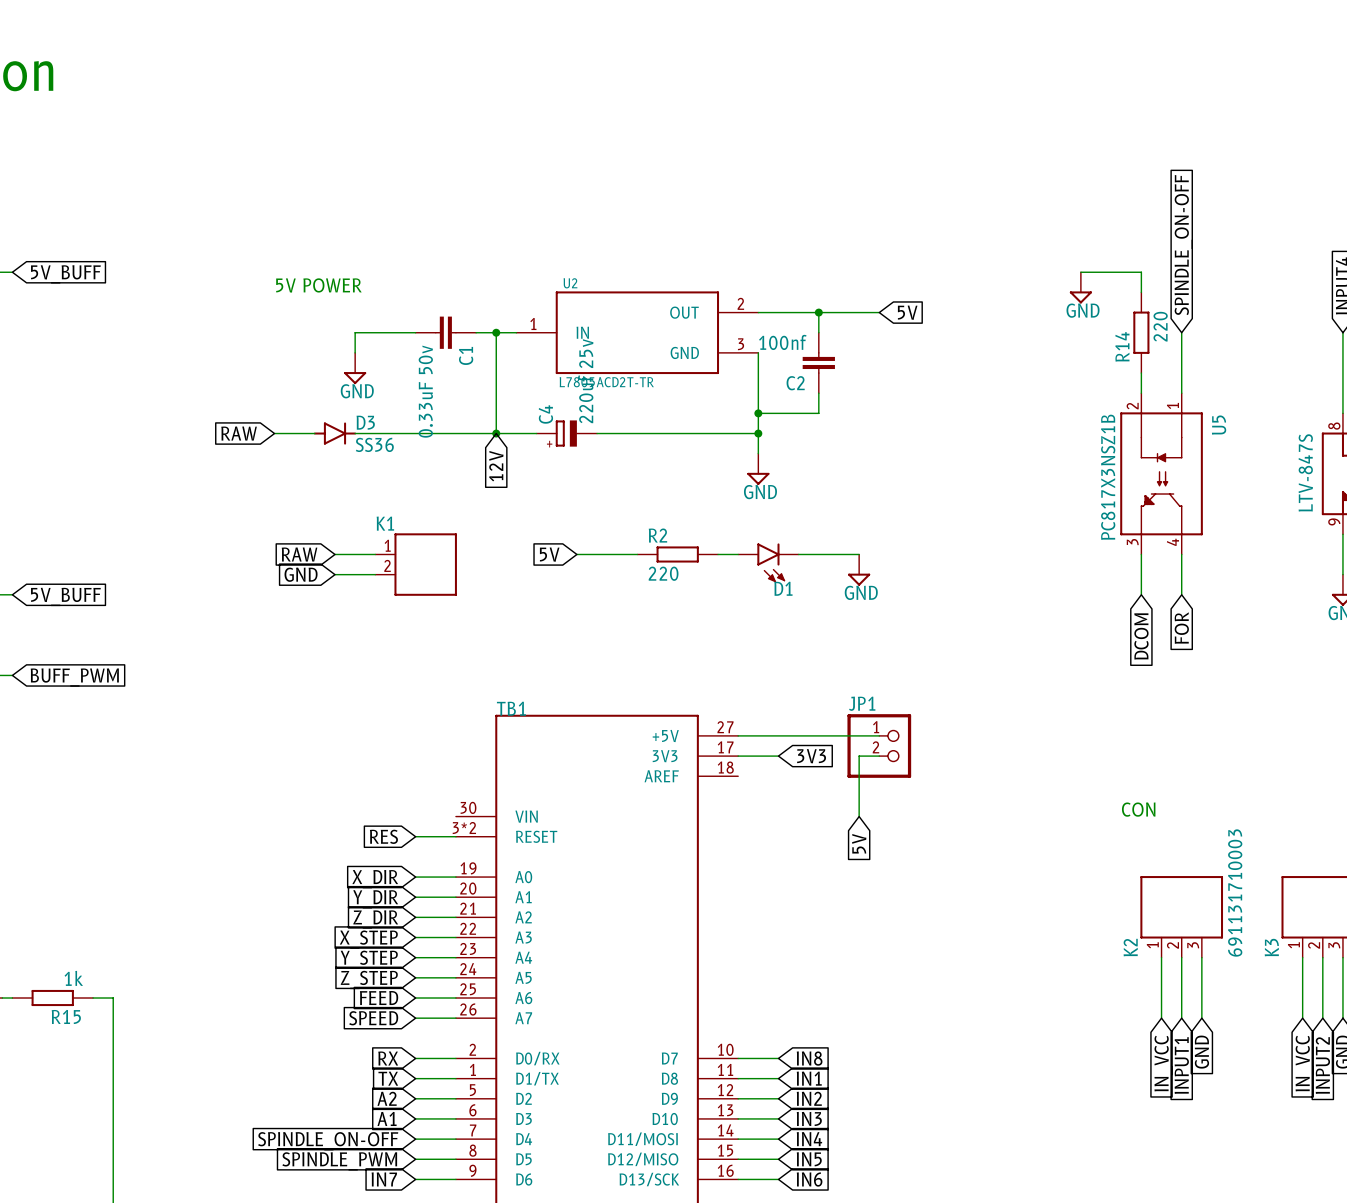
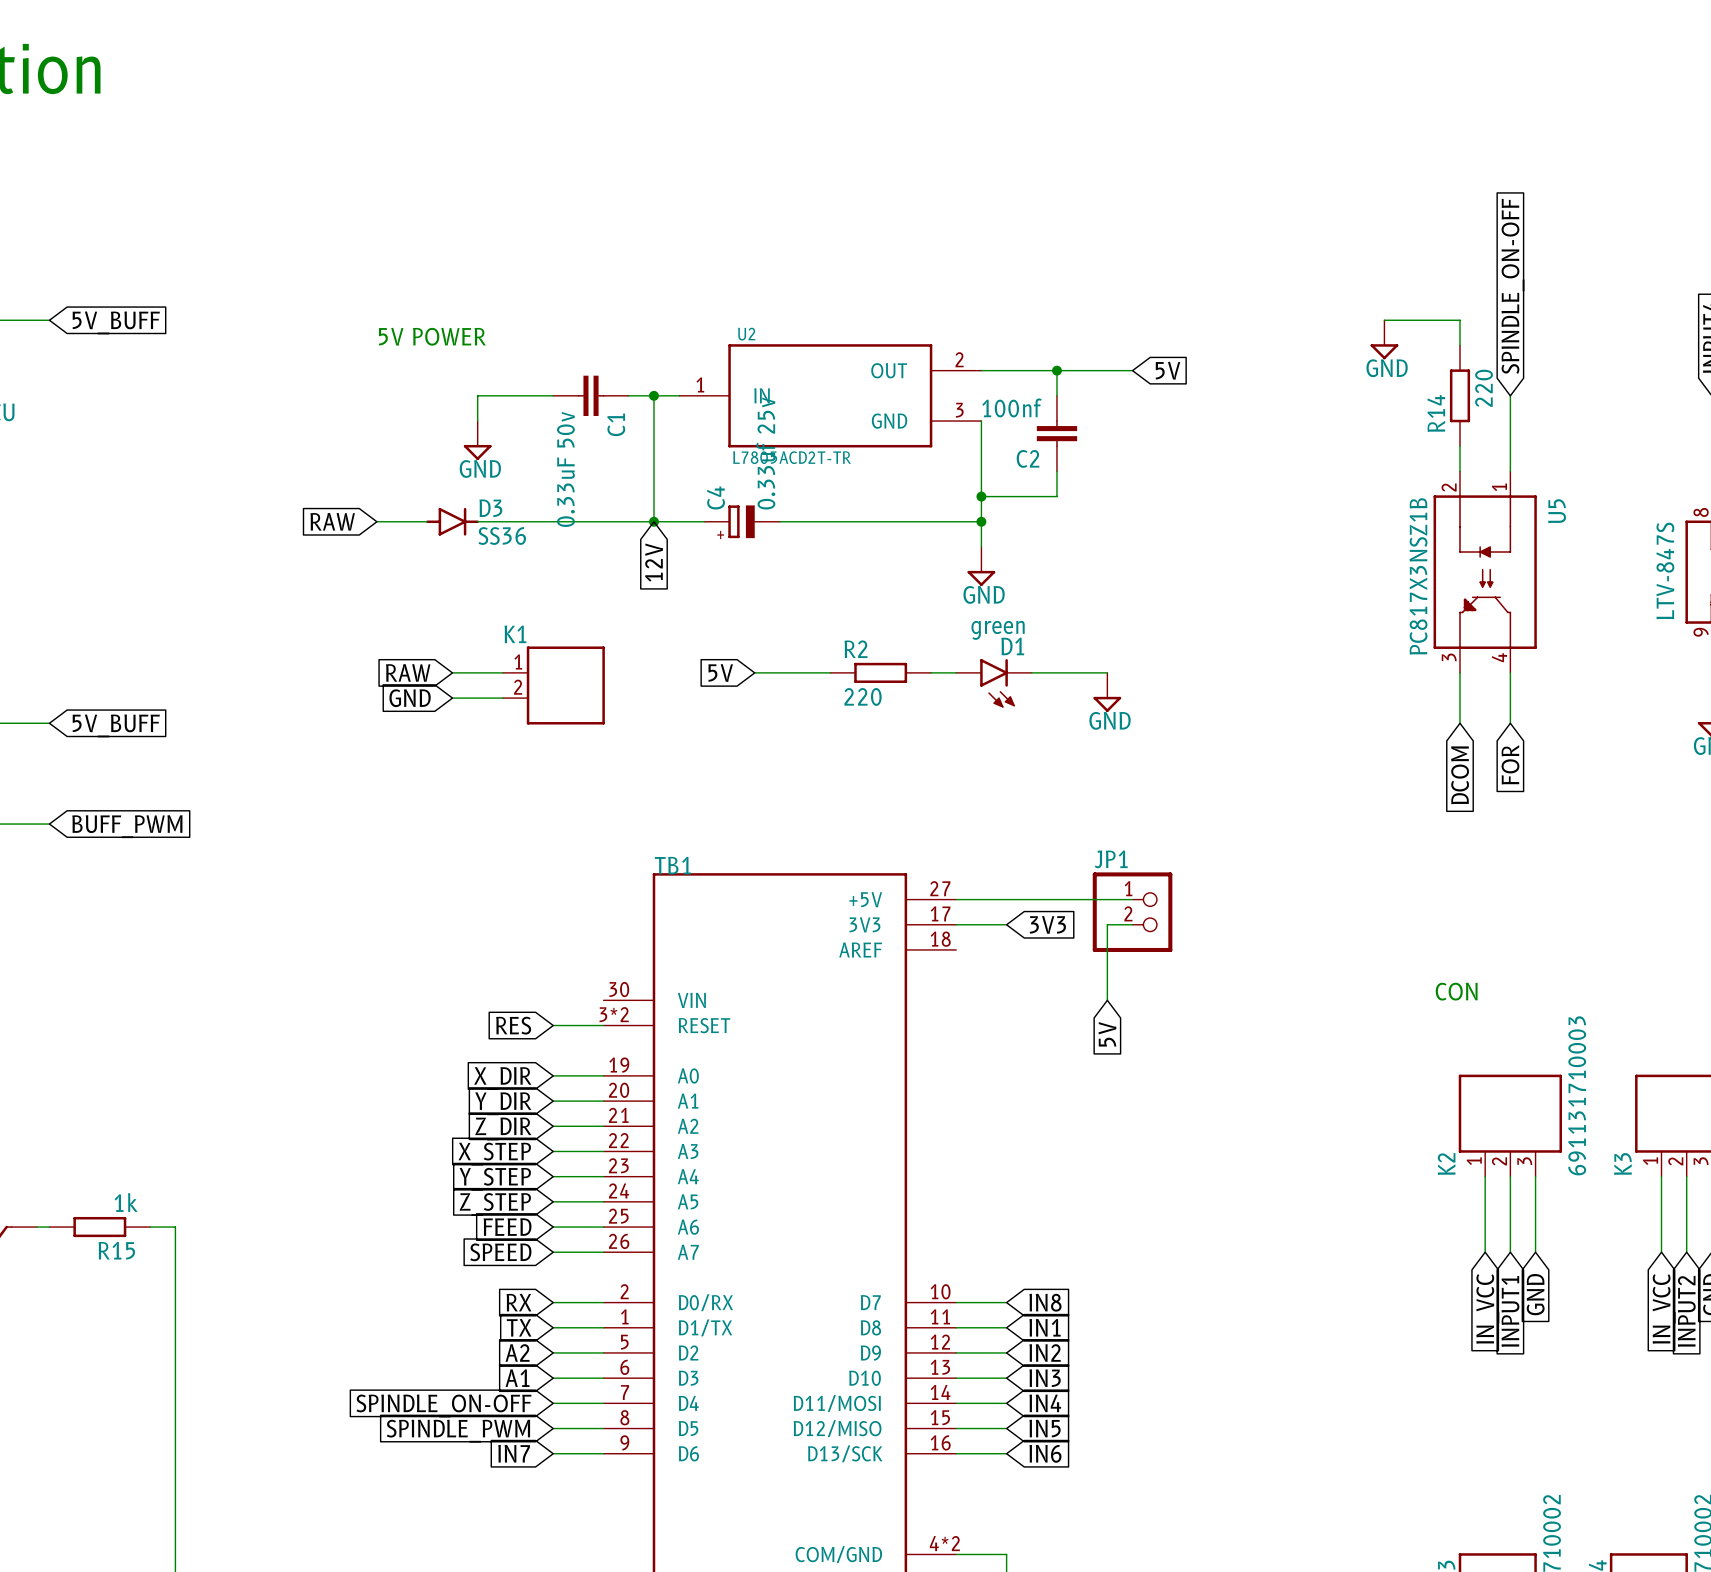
C4 value: 220uf 25v (585, 381) -> 0.33uf 25v (765, 453)
D1 value: none -> green (998, 630)
D1 name position: D1 (783, 588) -> D1 (1012, 646)

